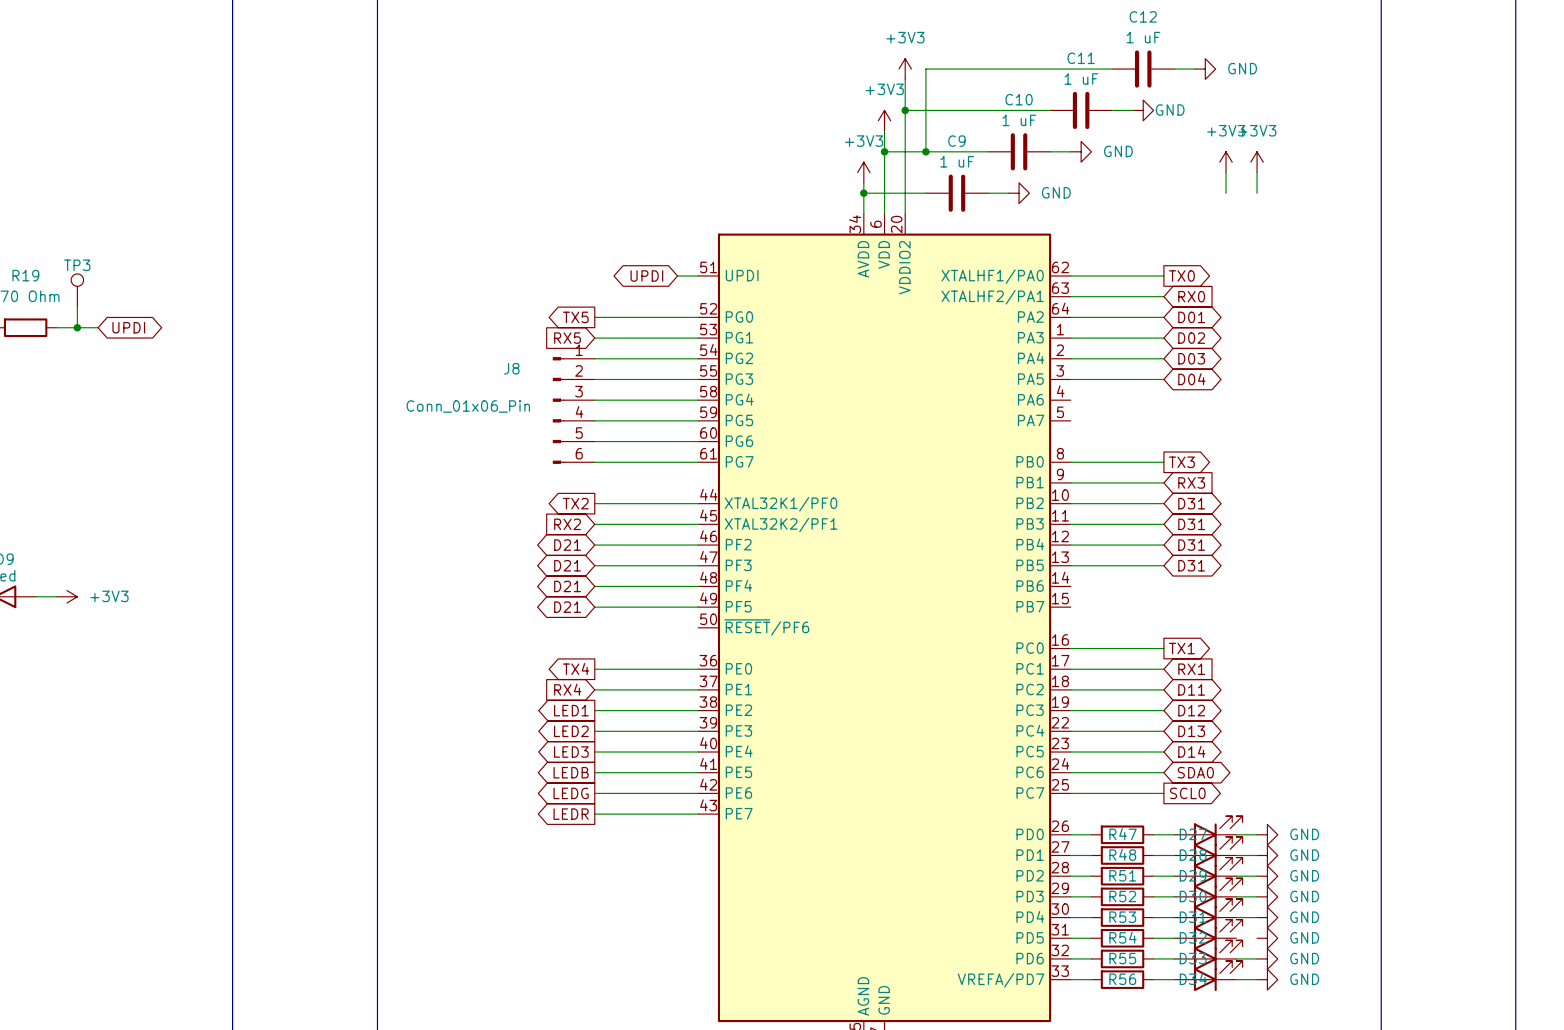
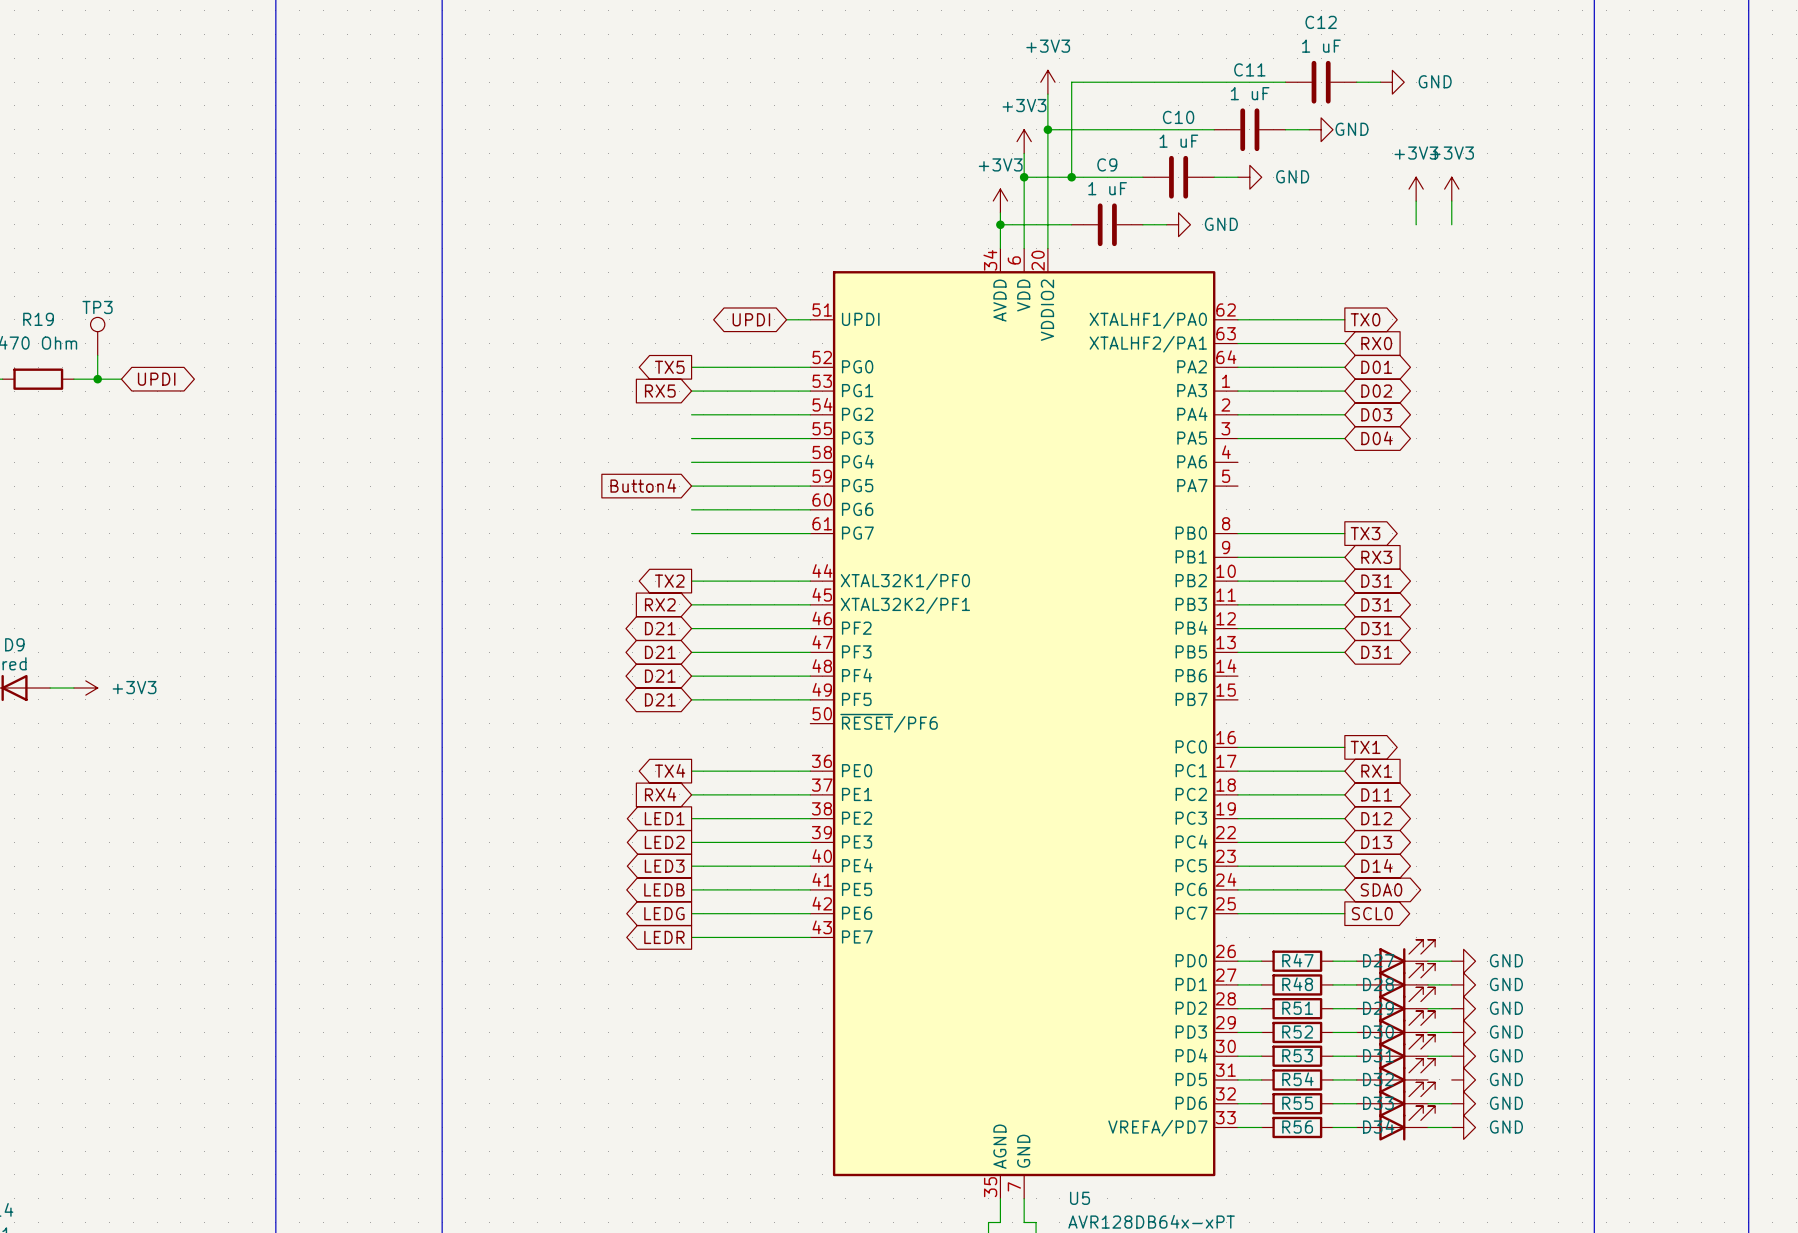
J8: Conn_01x06_Pin (573, 410) -> none
global label: none -> Button4 (643, 485)

